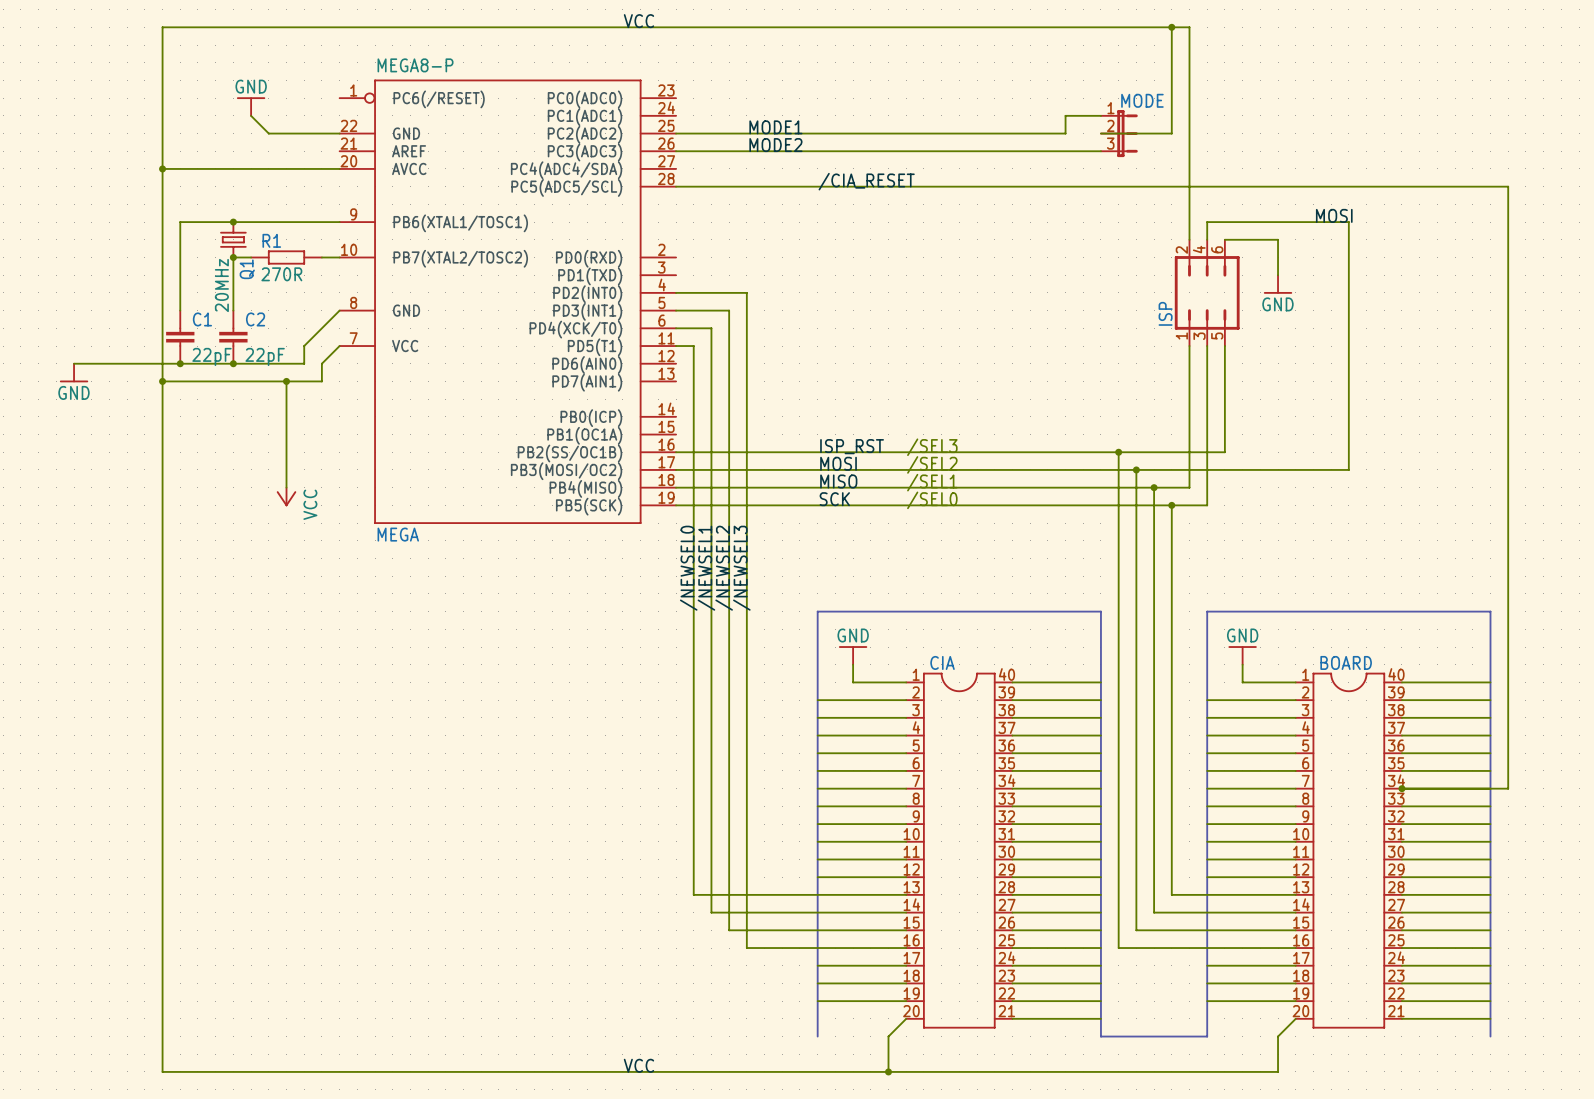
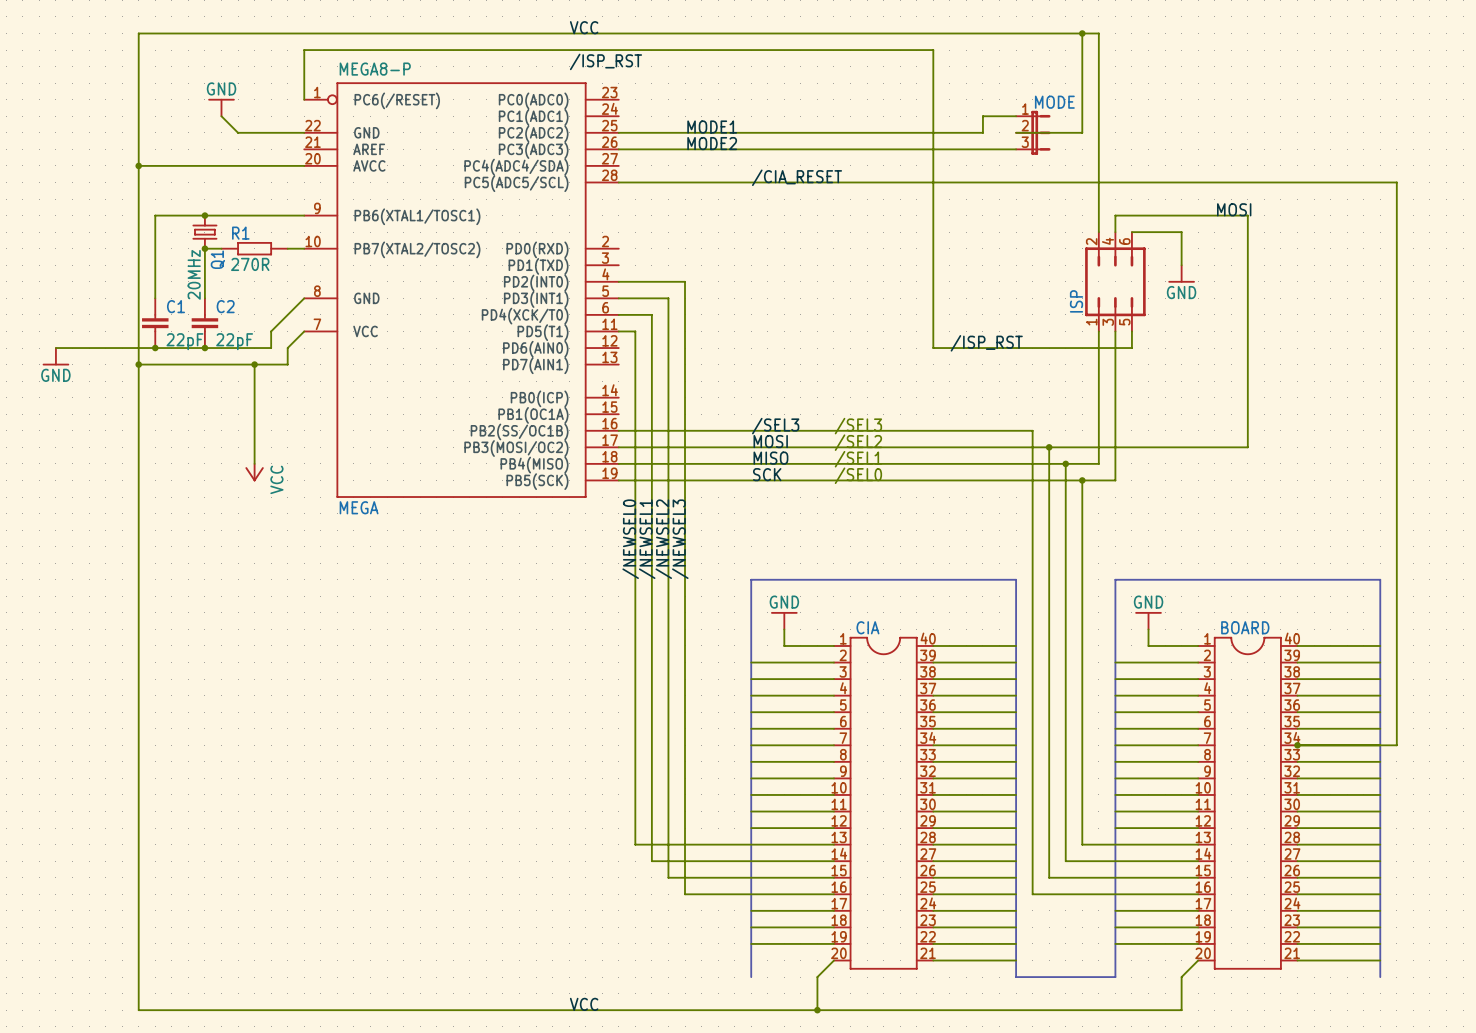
label: none -> /ISP_RST (605, 61)
label: none -> /ISP_RST (986, 343)
wire: (1224, 363) (1224, 452) (1118, 452) -> (1131, 348) (933, 348) (933, 50) (304, 50) (304, 99)
label: ISP_RST (852, 446) -> /SEL3 (775, 426)
junction: (1118, 452) -> none

